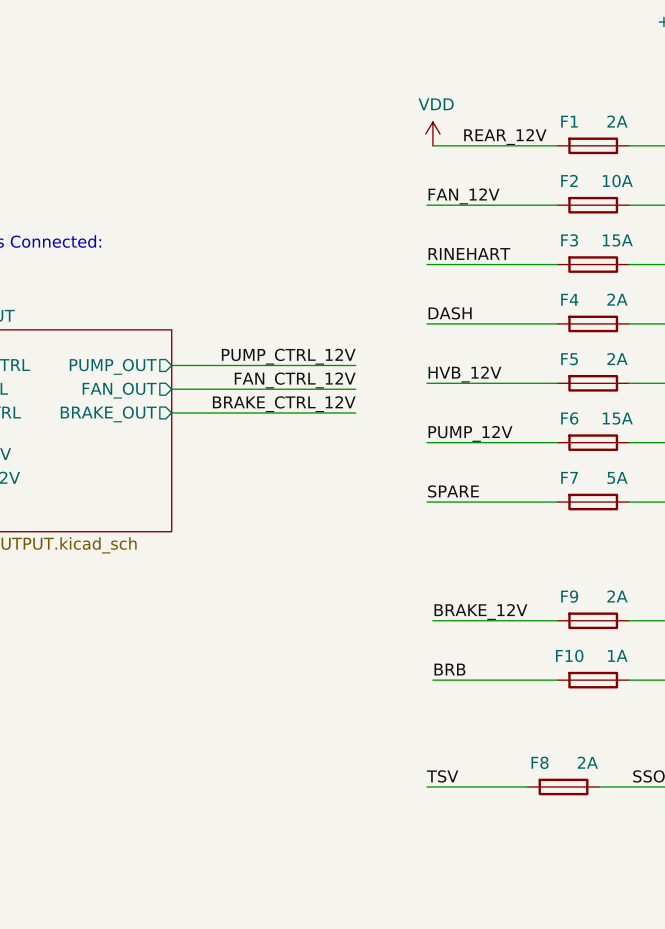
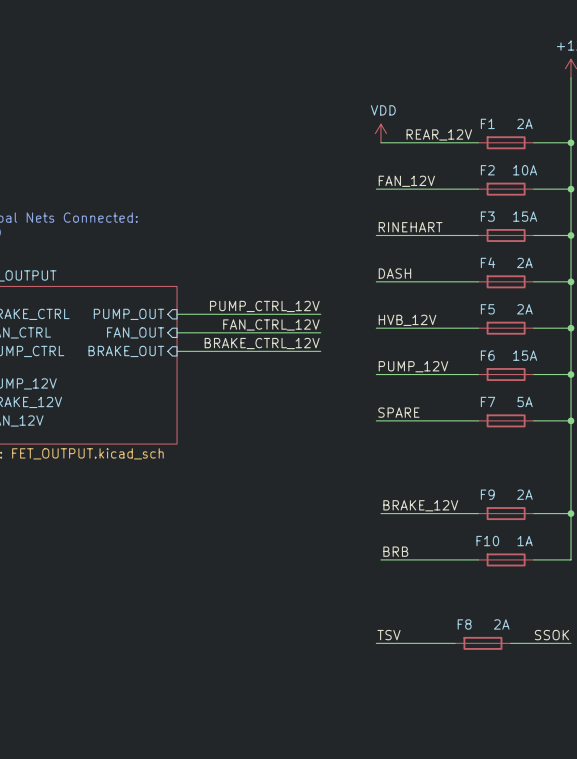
sheet pin shape: output (113, 366) -> input (128, 314)
sheet pin shape: output (119, 390) -> input (135, 332)
sheet pin shape: output (108, 414) -> input (126, 351)

